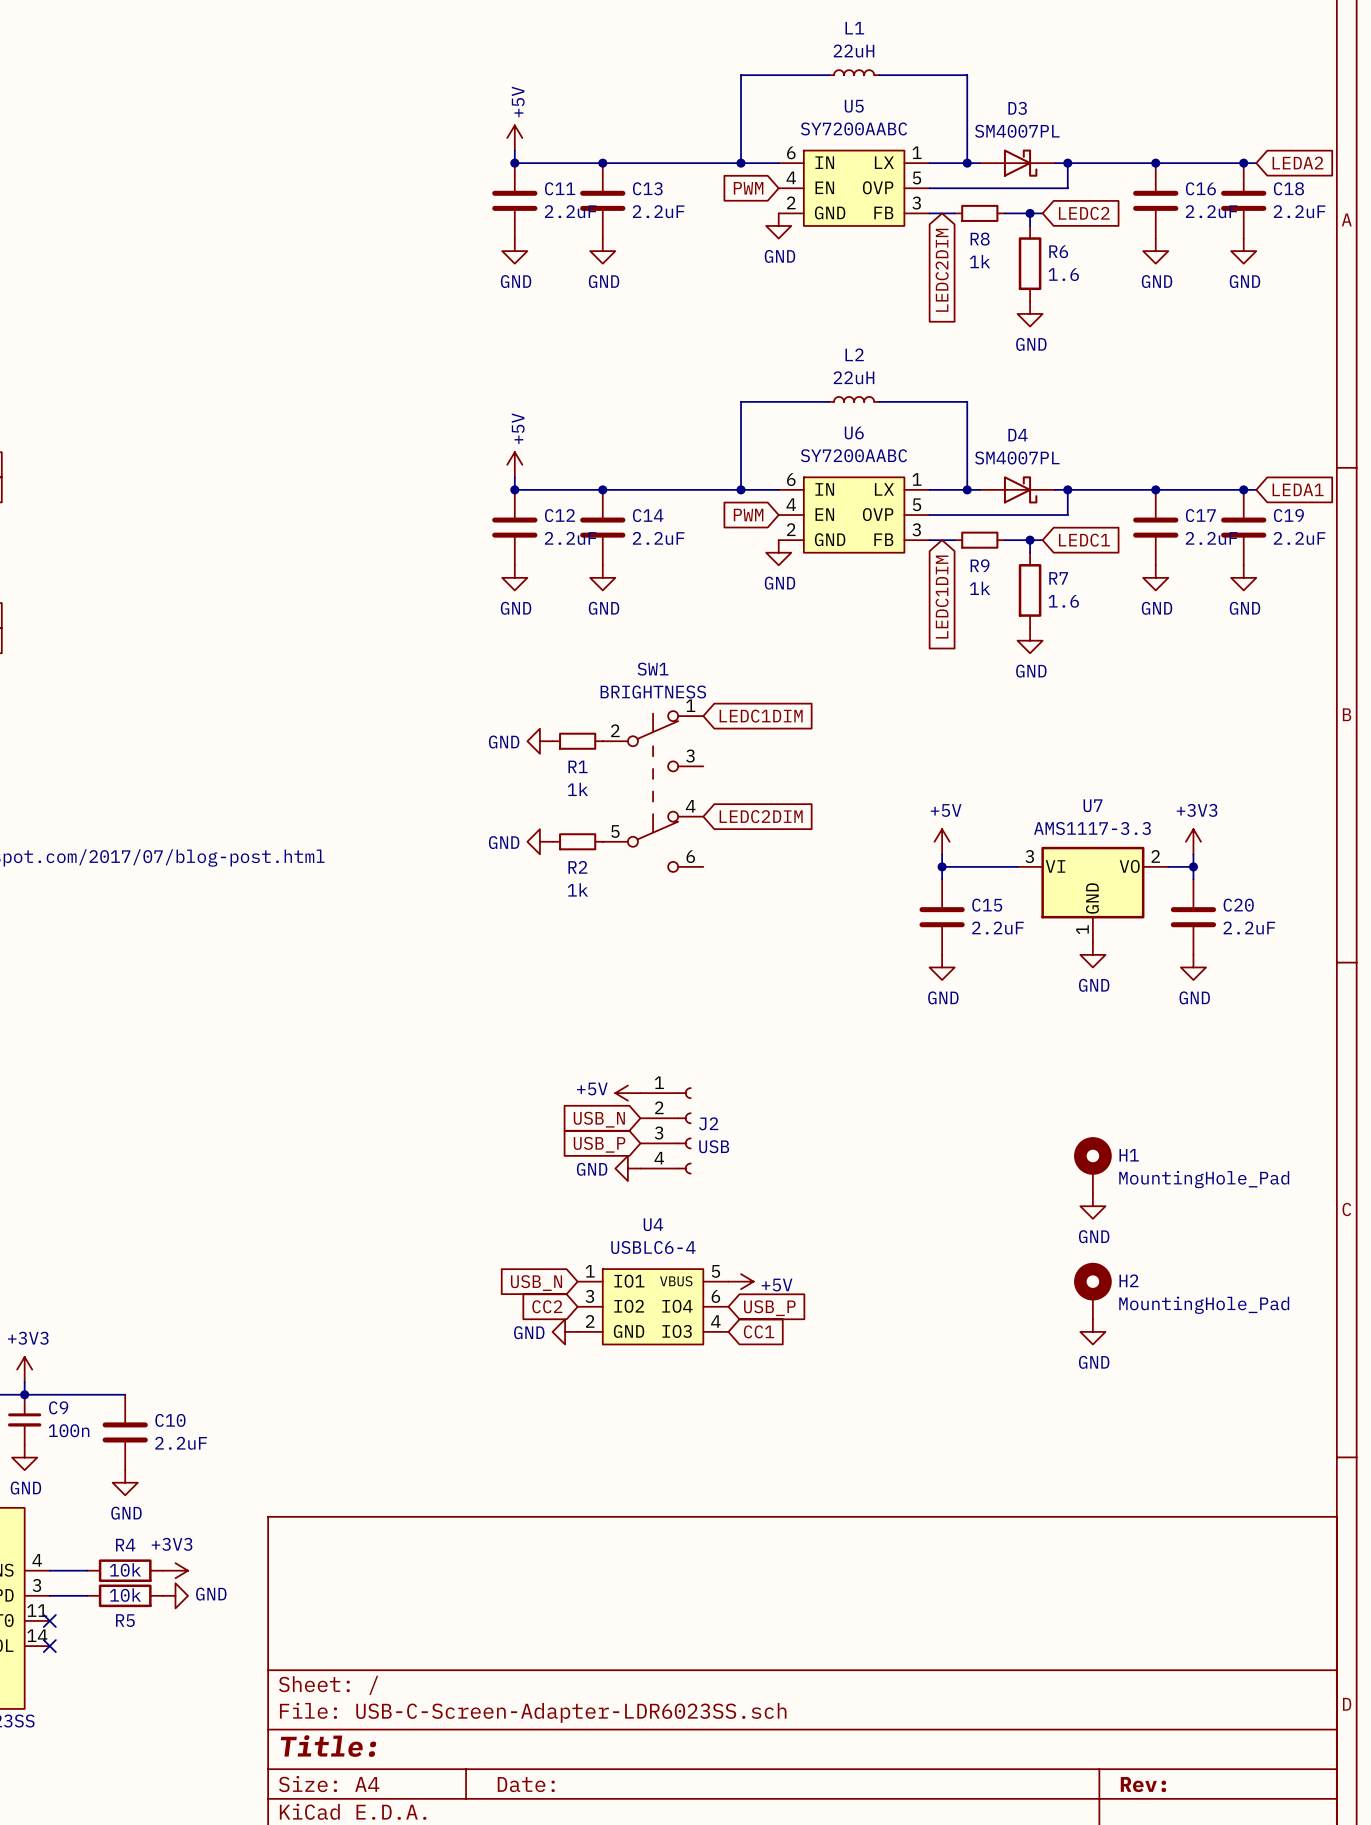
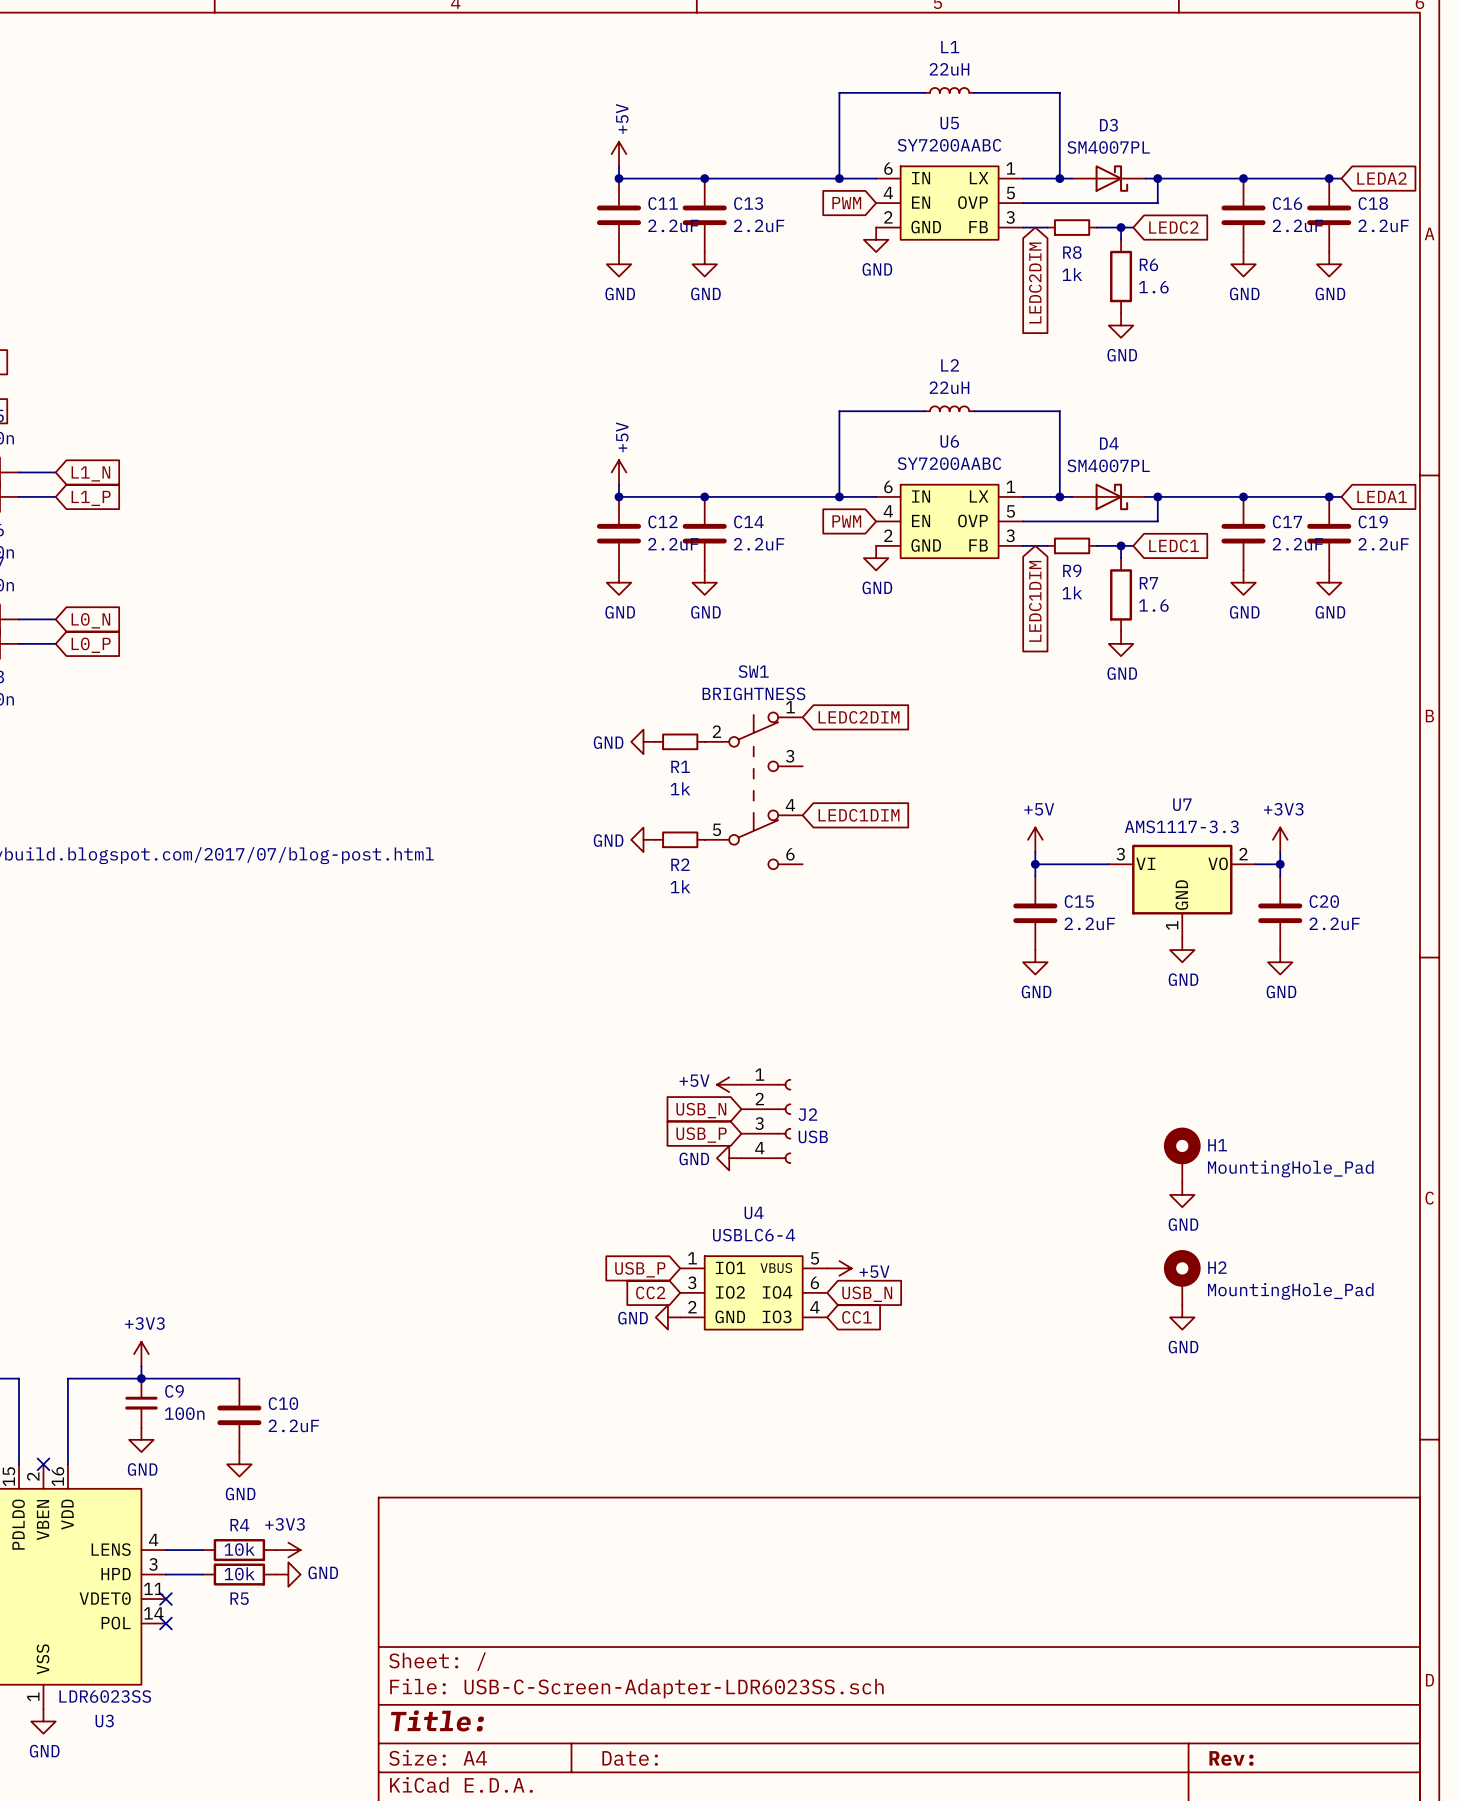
global label: LEDC1DIM (761, 716) -> LEDC2DIM (859, 717)
global label: LEDC2DIM (761, 816) -> LEDC1DIM (859, 815)
global label: USB_N (536, 1283) -> USB_P (640, 1269)
global label: USB_P (769, 1308) -> USB_N (867, 1294)

